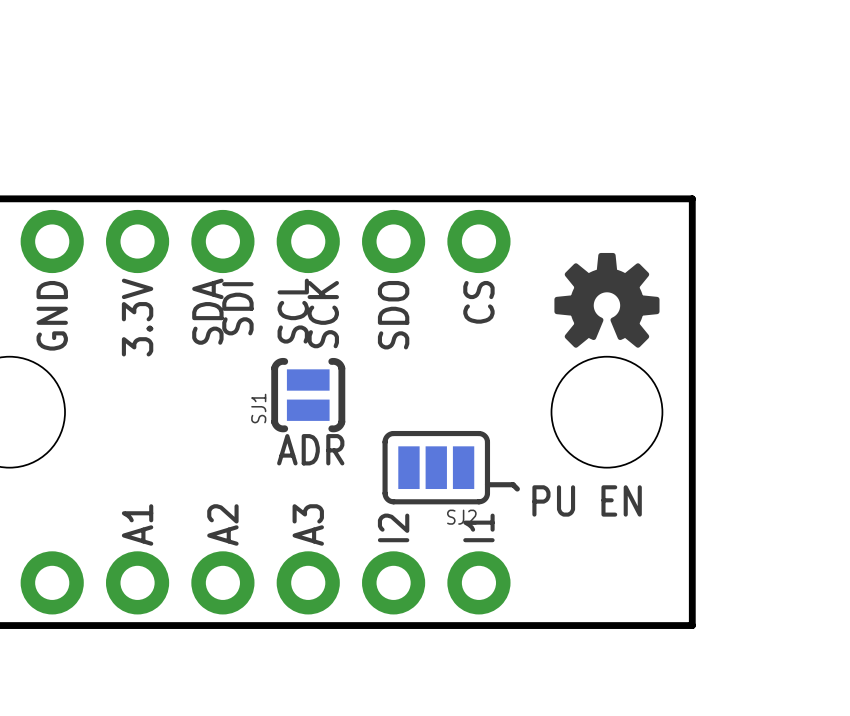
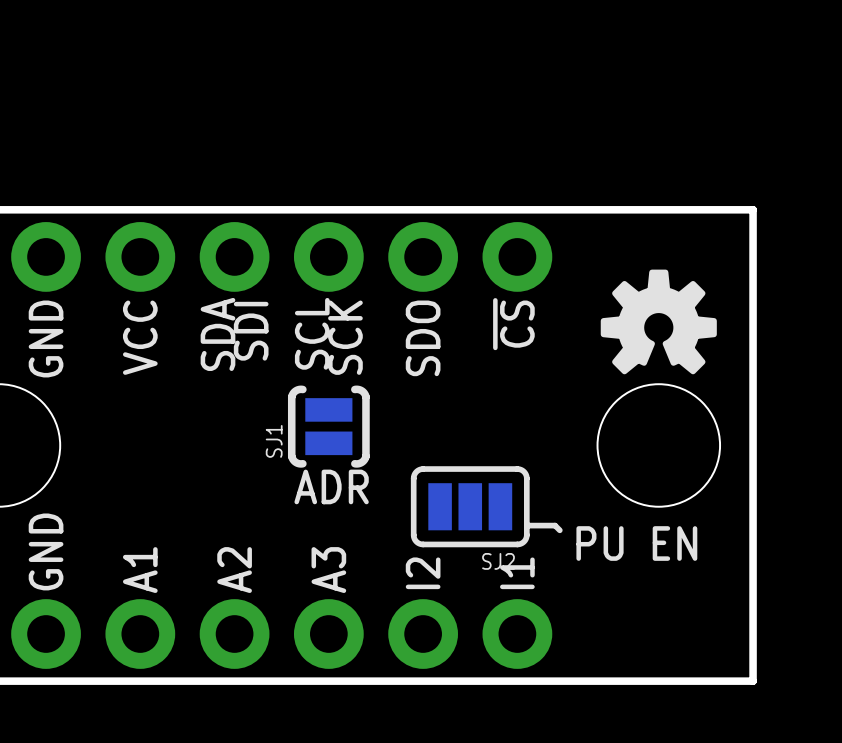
text: CS (478, 302) -> ~{CS} (513, 324)
text: 3.3V (137, 317) -> VCC (140, 337)
text: none -> GND (46, 551)

